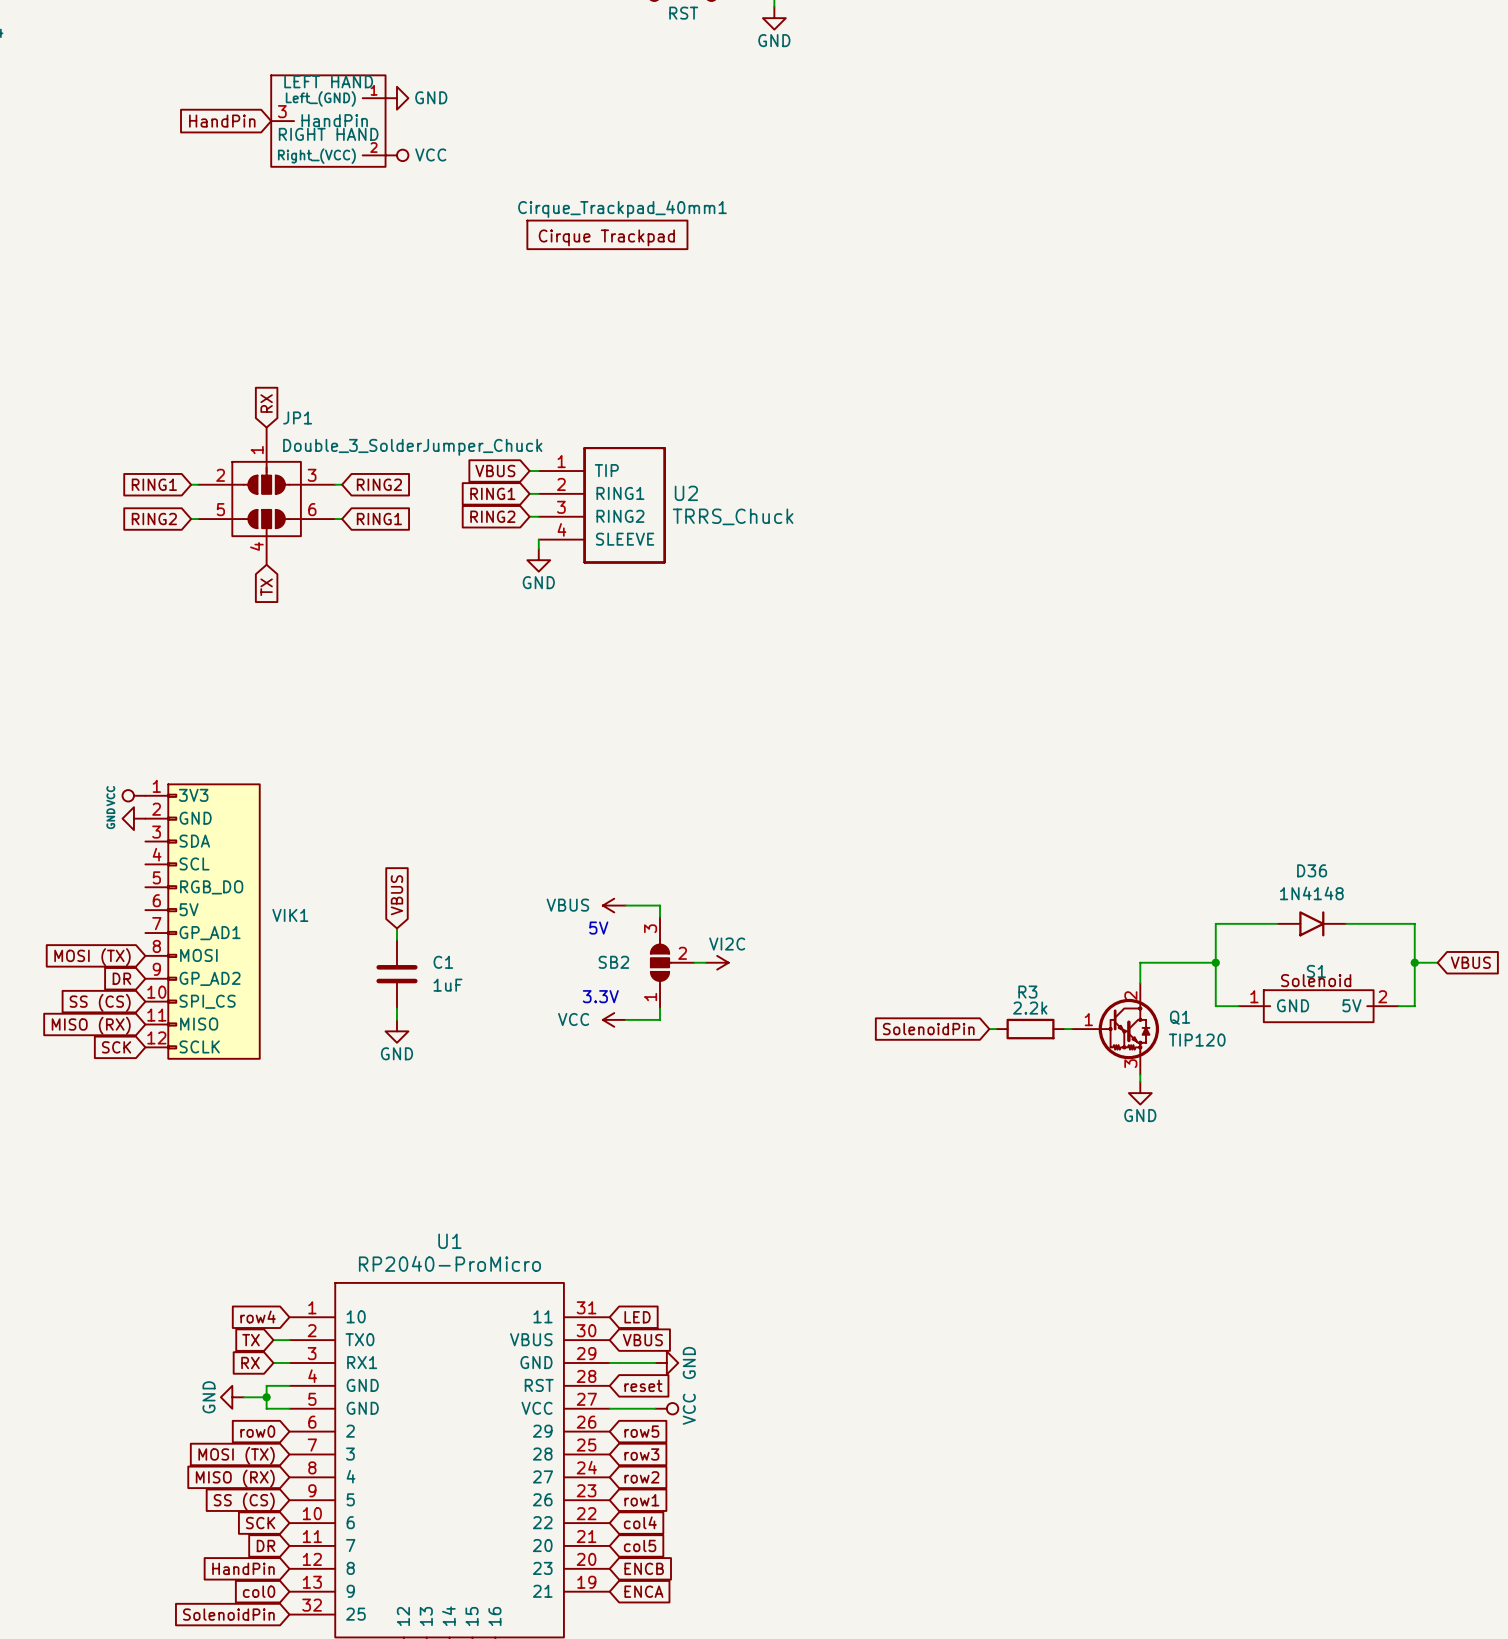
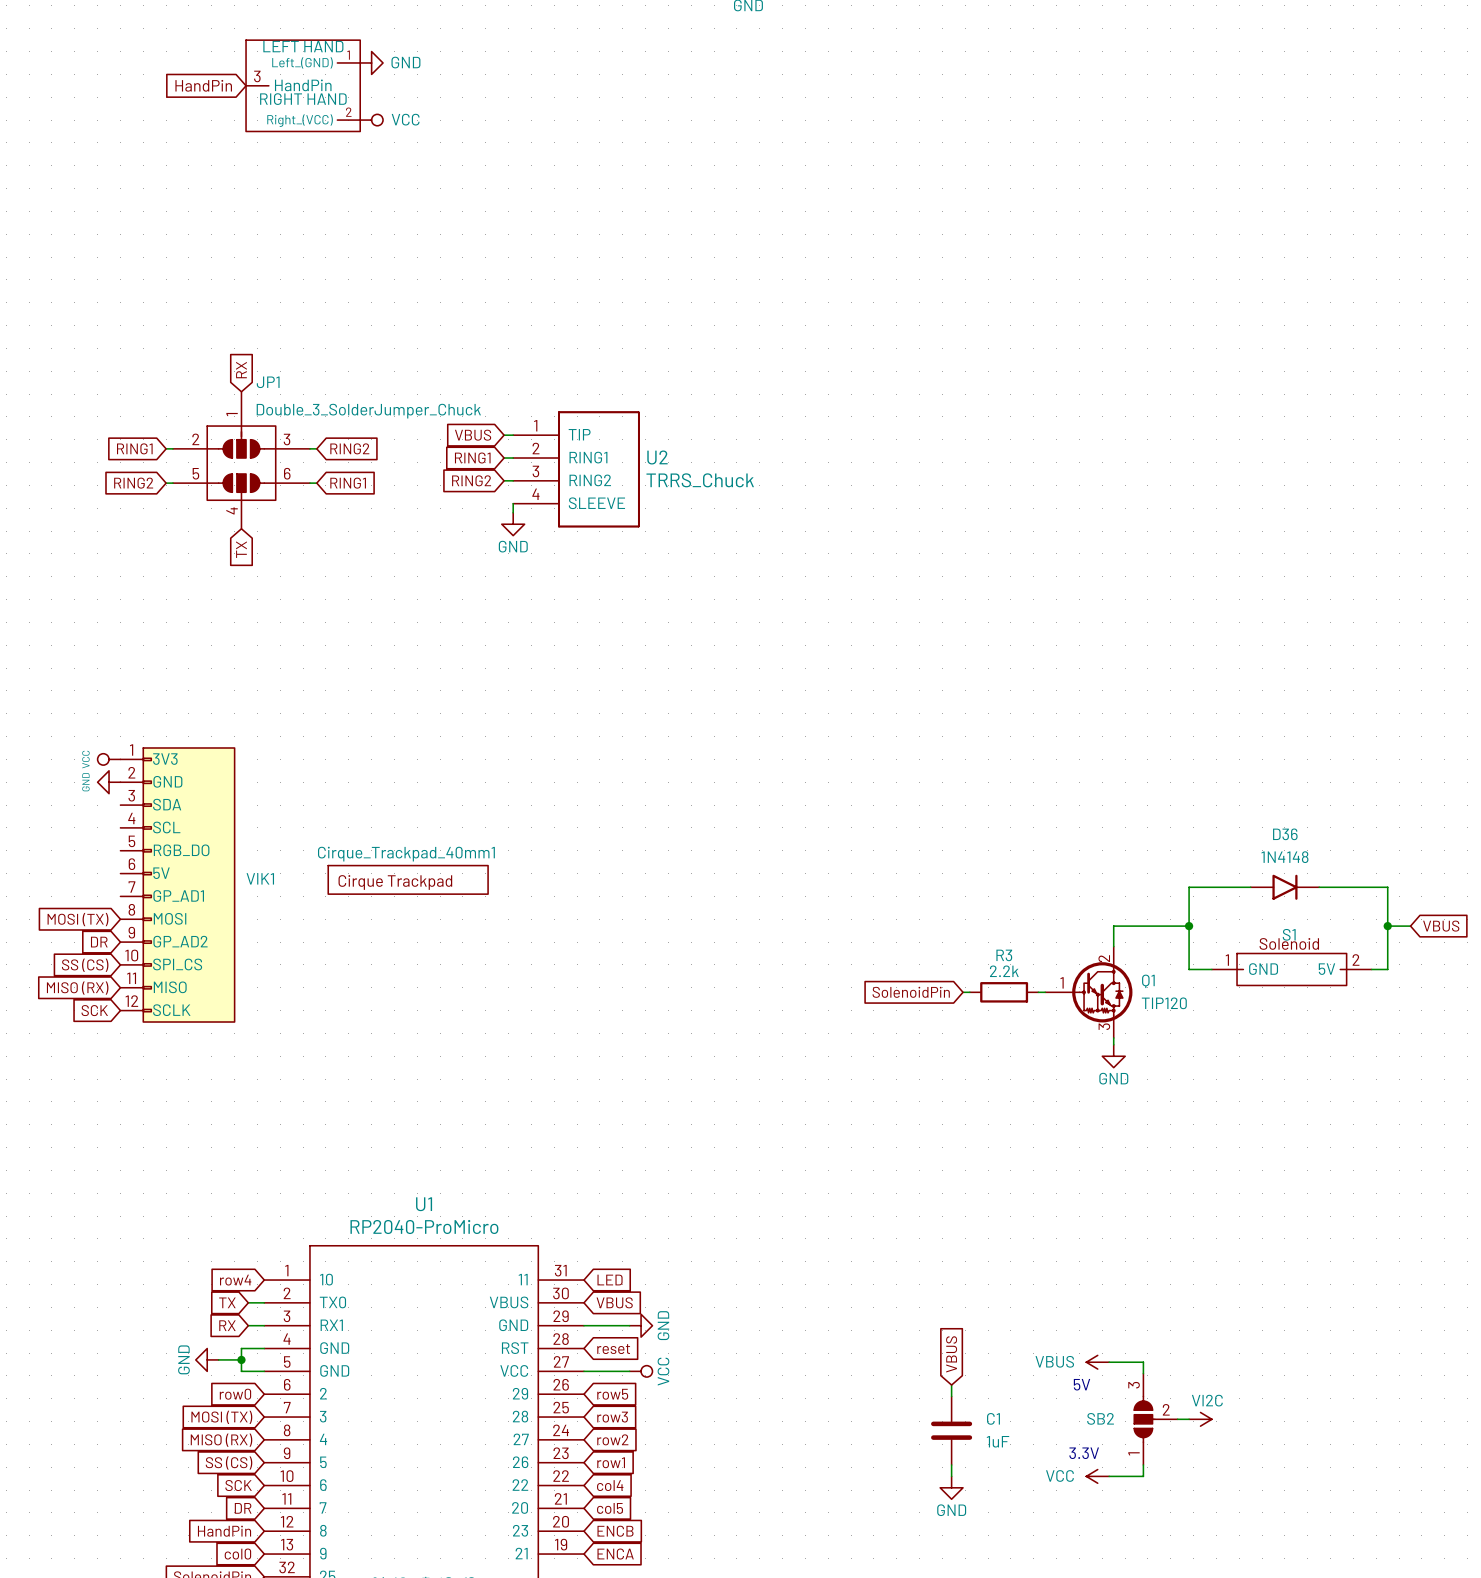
Cirque_Trackpad_40mm1 position: (607, 234) -> (408, 879)
global label: VBUS (396, 895) -> none
power symbol: VBUS (614, 905) -> none
wire: (625, 905) (660, 905) (660, 917) -> none
wire: (396, 928) (396, 939) -> none
text: 5V (598, 928) -> none
SB2 position: (672, 962) -> (1155, 1419)
wire: (694, 962) (705, 962) -> none
power symbol: VI2C (717, 962) -> none
C1 position: (396, 974) -> (951, 1430)
text: 3.3V (600, 996) -> none
wire: (396, 1008) (396, 1019) -> none
wire: (660, 1008) (660, 1019) (625, 1019) -> none
power symbol: VCC (614, 1019) -> none
power symbol: GND (396, 1031) -> none
global label: none -> VBUS (951, 1354)
power symbol: none -> VBUS (1097, 1362)
wire: none -> (1109, 1362) (1143, 1362) (1143, 1373)
wire: none -> (951, 1385) (951, 1396)
text: none -> 5V (1082, 1384)
wire: none -> (1177, 1419) (1189, 1419)
power symbol: none -> VI2C (1200, 1419)
text: none -> 3.3V (1084, 1453)
wire: none -> (951, 1464) (951, 1476)
wire: none -> (1143, 1464) (1143, 1476) (1109, 1476)
power symbol: none -> VCC (1097, 1476)
power symbol: none -> GND (951, 1487)

